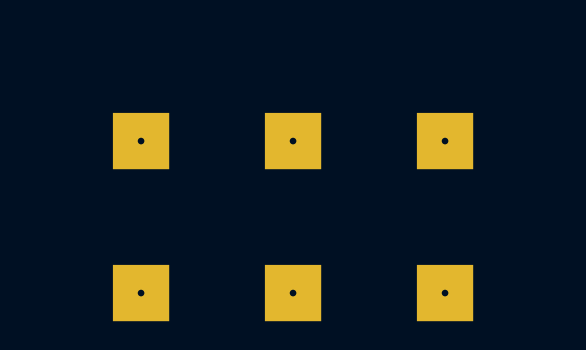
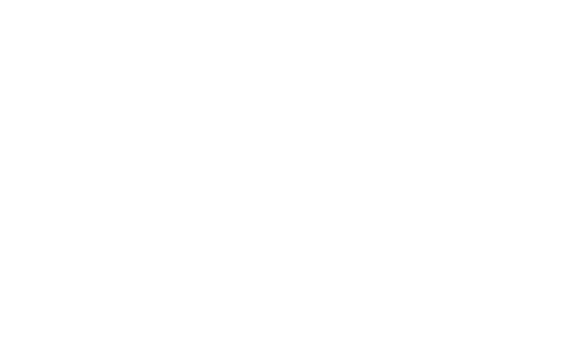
part: (141, 141) -> none
part: (293, 141) -> none
part: (445, 141) -> none
part: (141, 293) -> none
part: (293, 293) -> none
part: (445, 293) -> none

